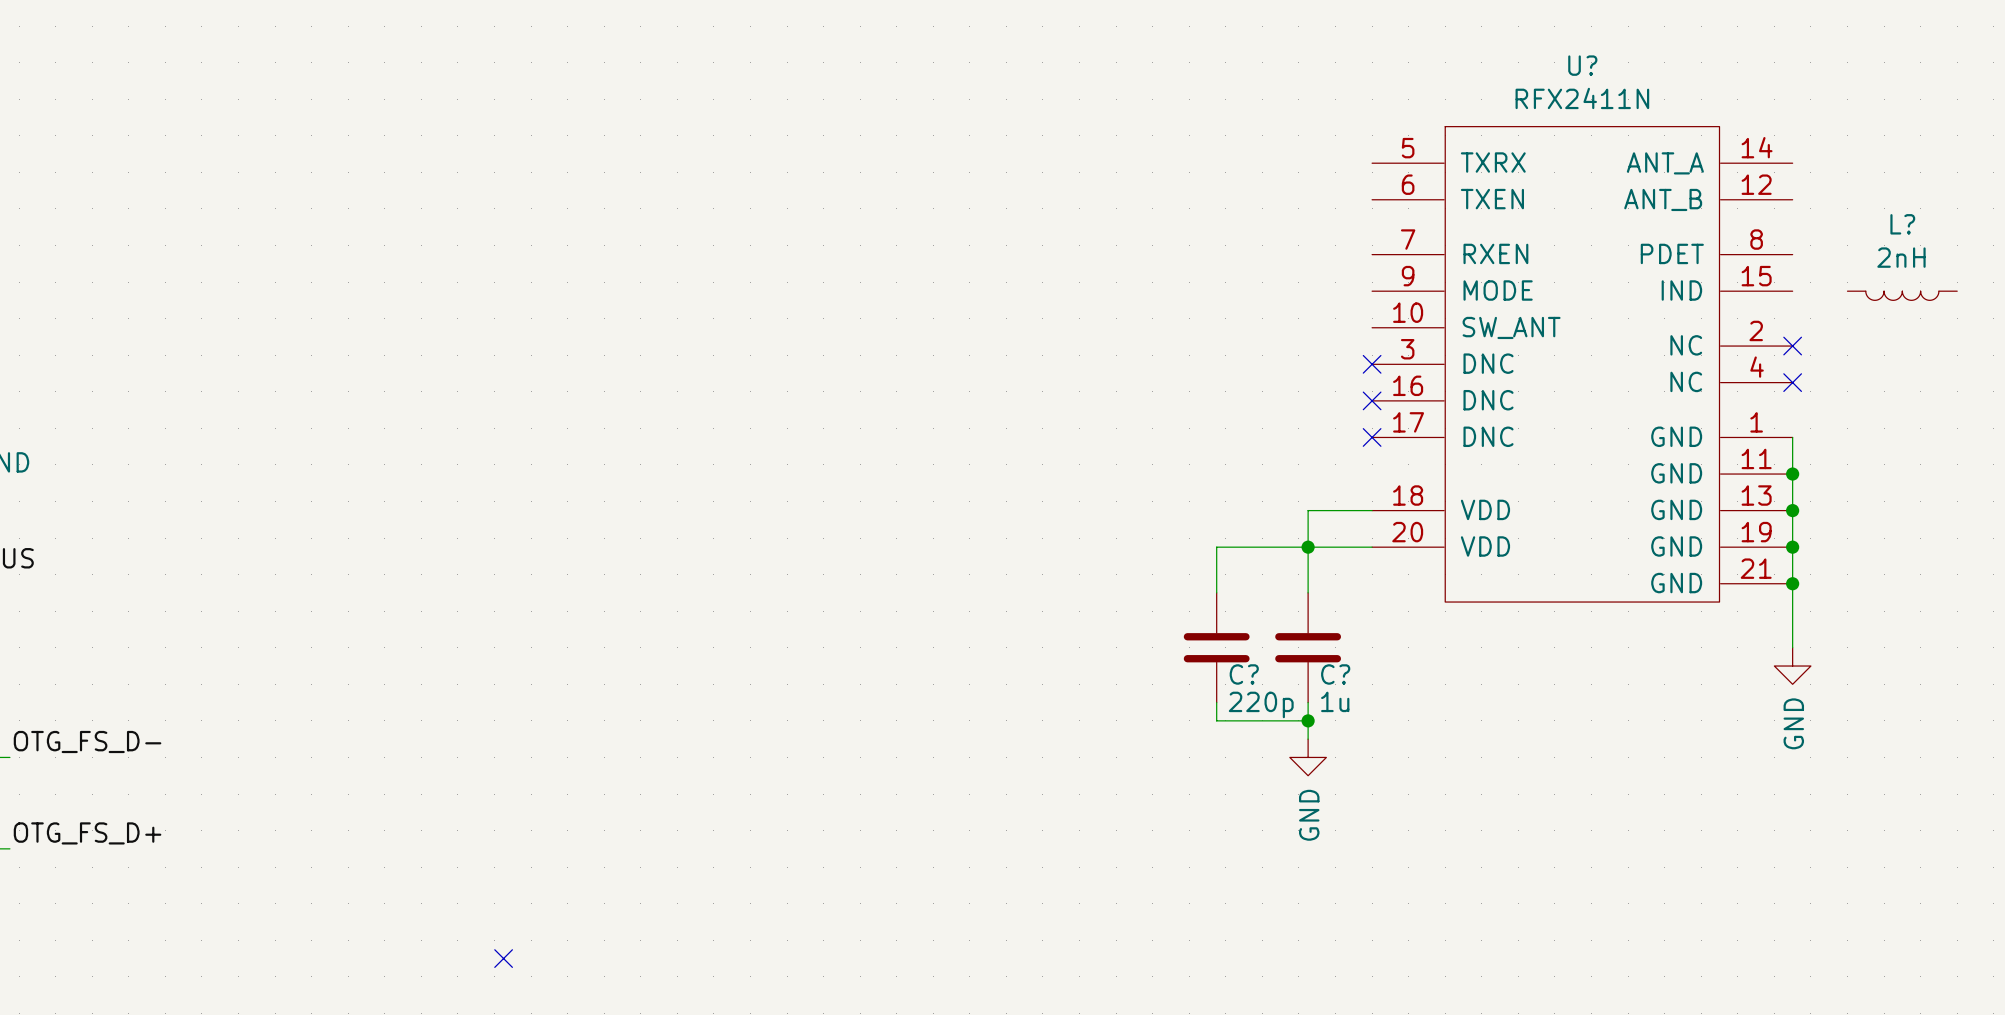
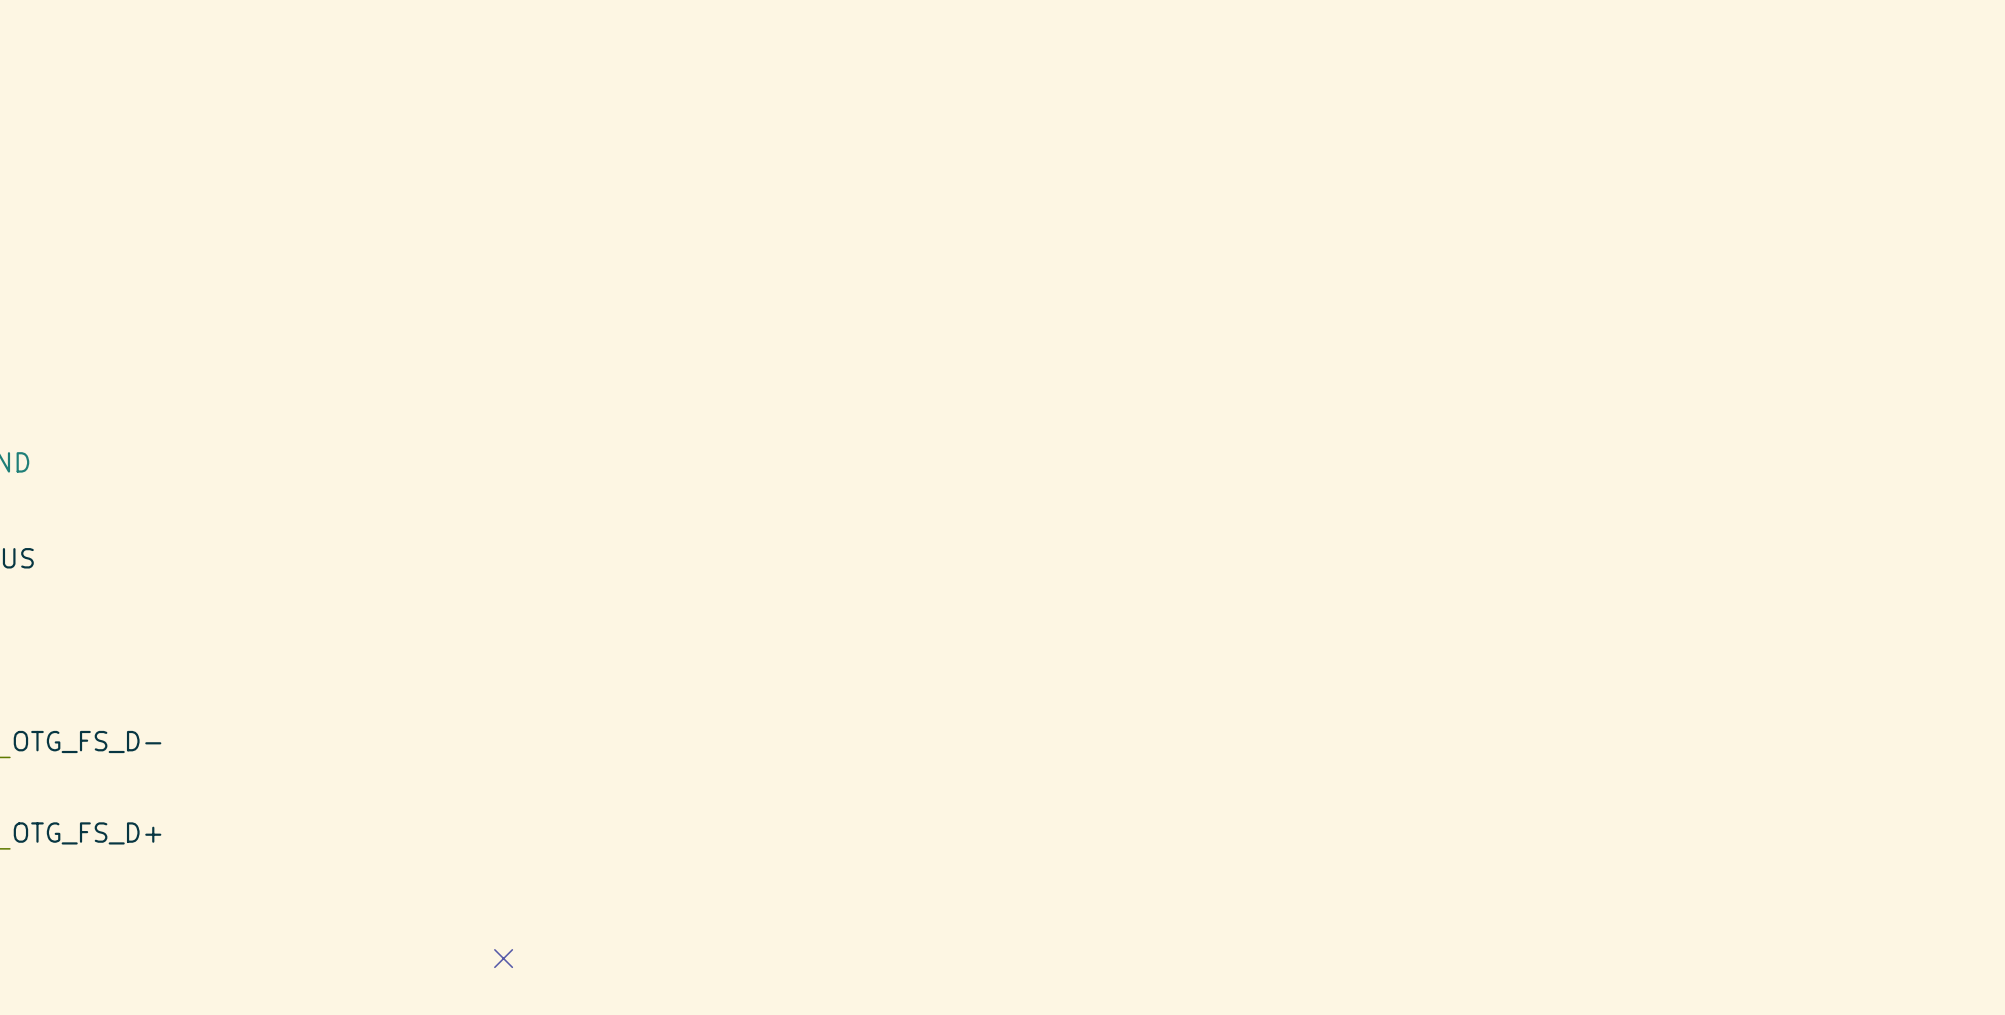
L?: 2nH (1902, 295) -> none
no-connect mark: (1792, 346) -> none
no-connect mark: (1372, 364) -> none
U?: RFX2411N (1582, 364) -> none
no-connect mark: (1792, 382) -> none
no-connect mark: (1372, 400) -> none
no-connect mark: (1372, 437) -> none
wire: (1792, 437) (1792, 647) -> none
junction: (1792, 474) -> none
wire: (1372, 510) (1308, 510) (1308, 592) -> none
junction: (1792, 510) -> none
junction: (1308, 547) -> none
wire: (1372, 547) (1216, 547) (1216, 592) -> none
junction: (1792, 547) -> none
junction: (1792, 583) -> none
C?: 220p (1216, 647) -> none
C?: 1u (1308, 647) -> none
power symbol: GND (1792, 666) -> none
wire: (1216, 702) (1216, 720) (1308, 720) -> none
wire: (1308, 702) (1308, 739) -> none
junction: (1308, 720) -> none
power symbol: GND (1308, 757) -> none

